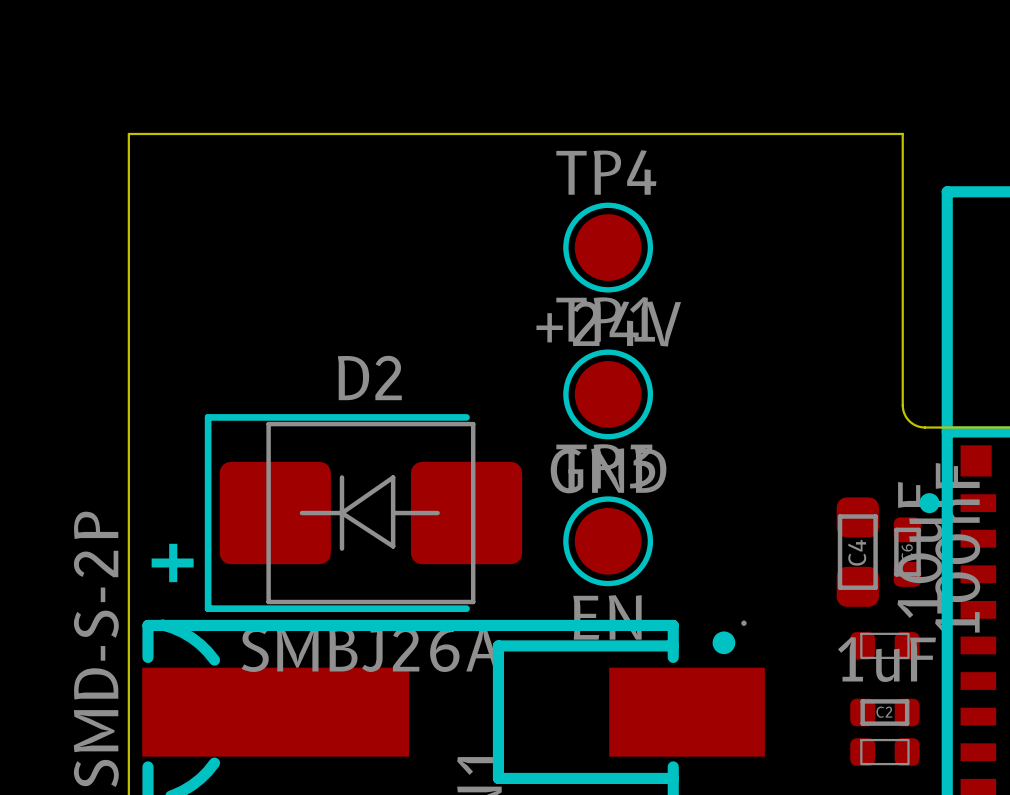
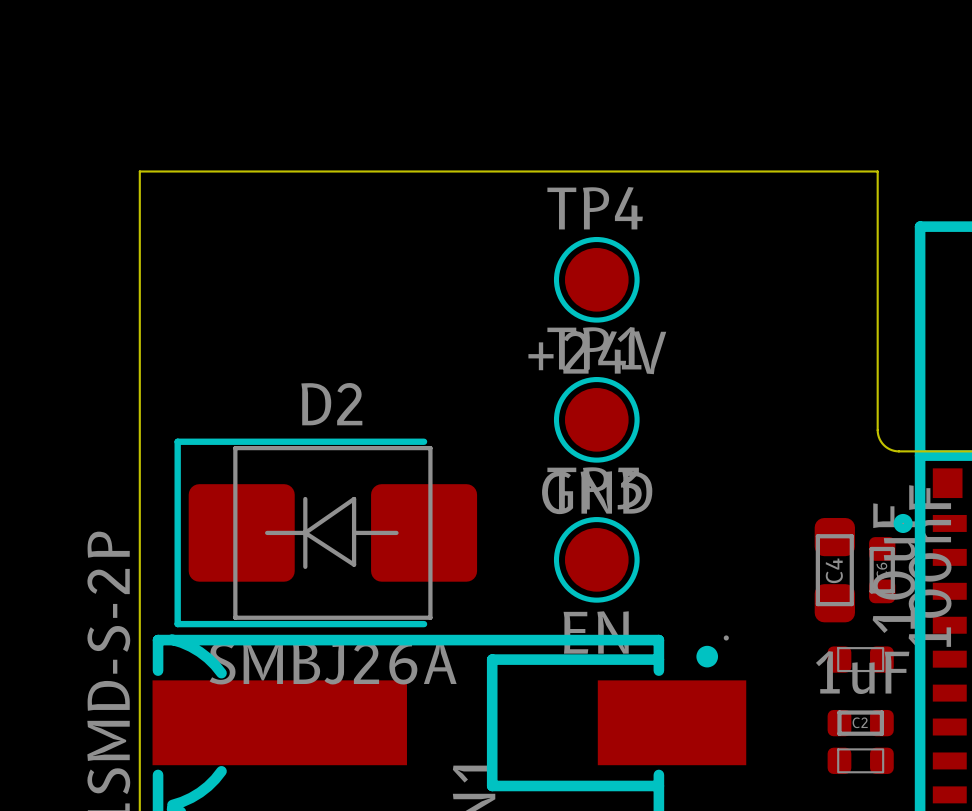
D2 position: (363, 513) -> (325, 532)
text: + (172, 562) -> none

